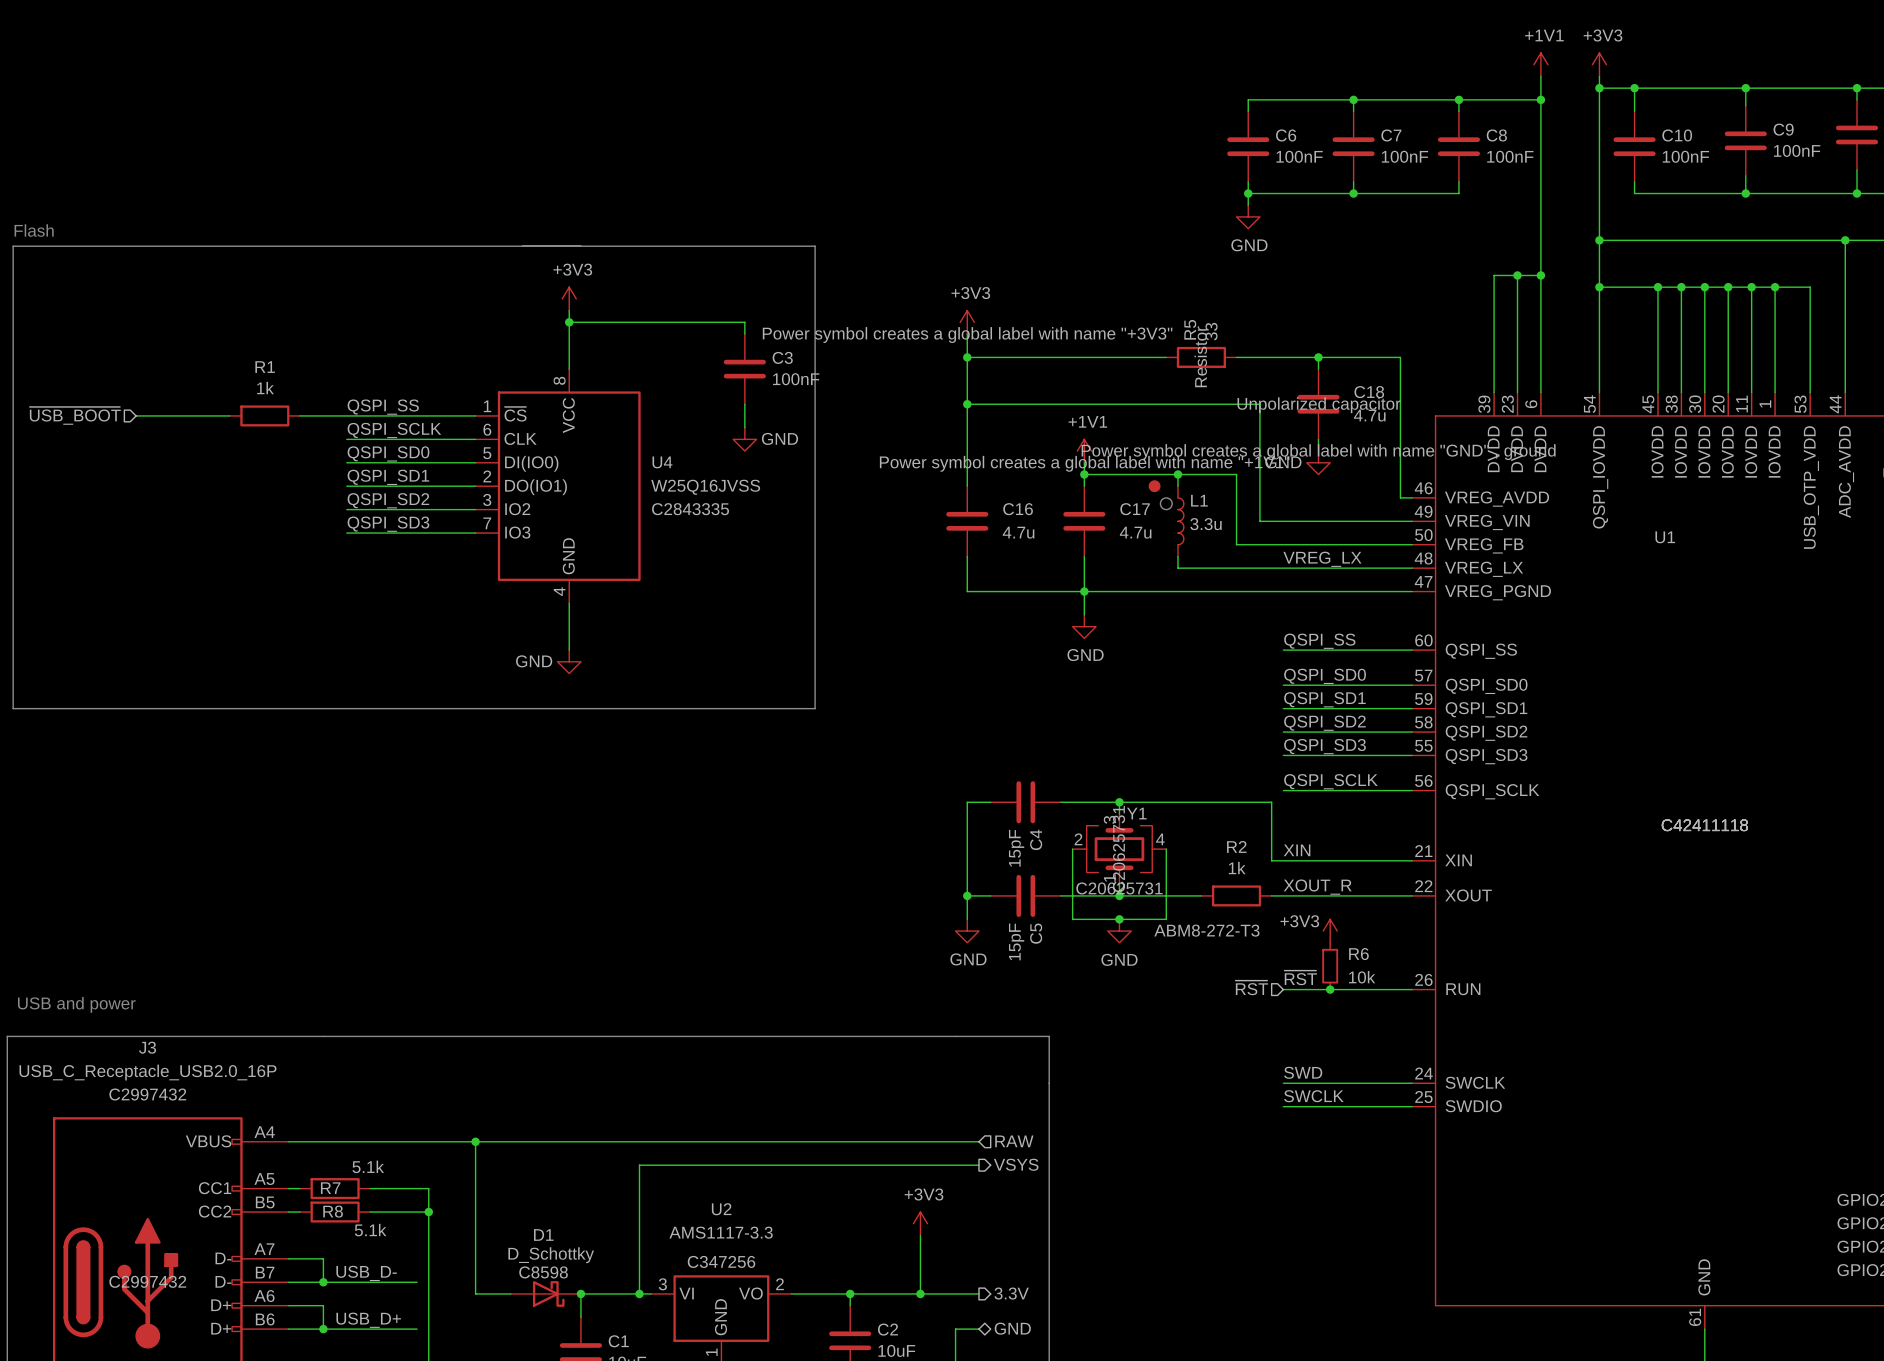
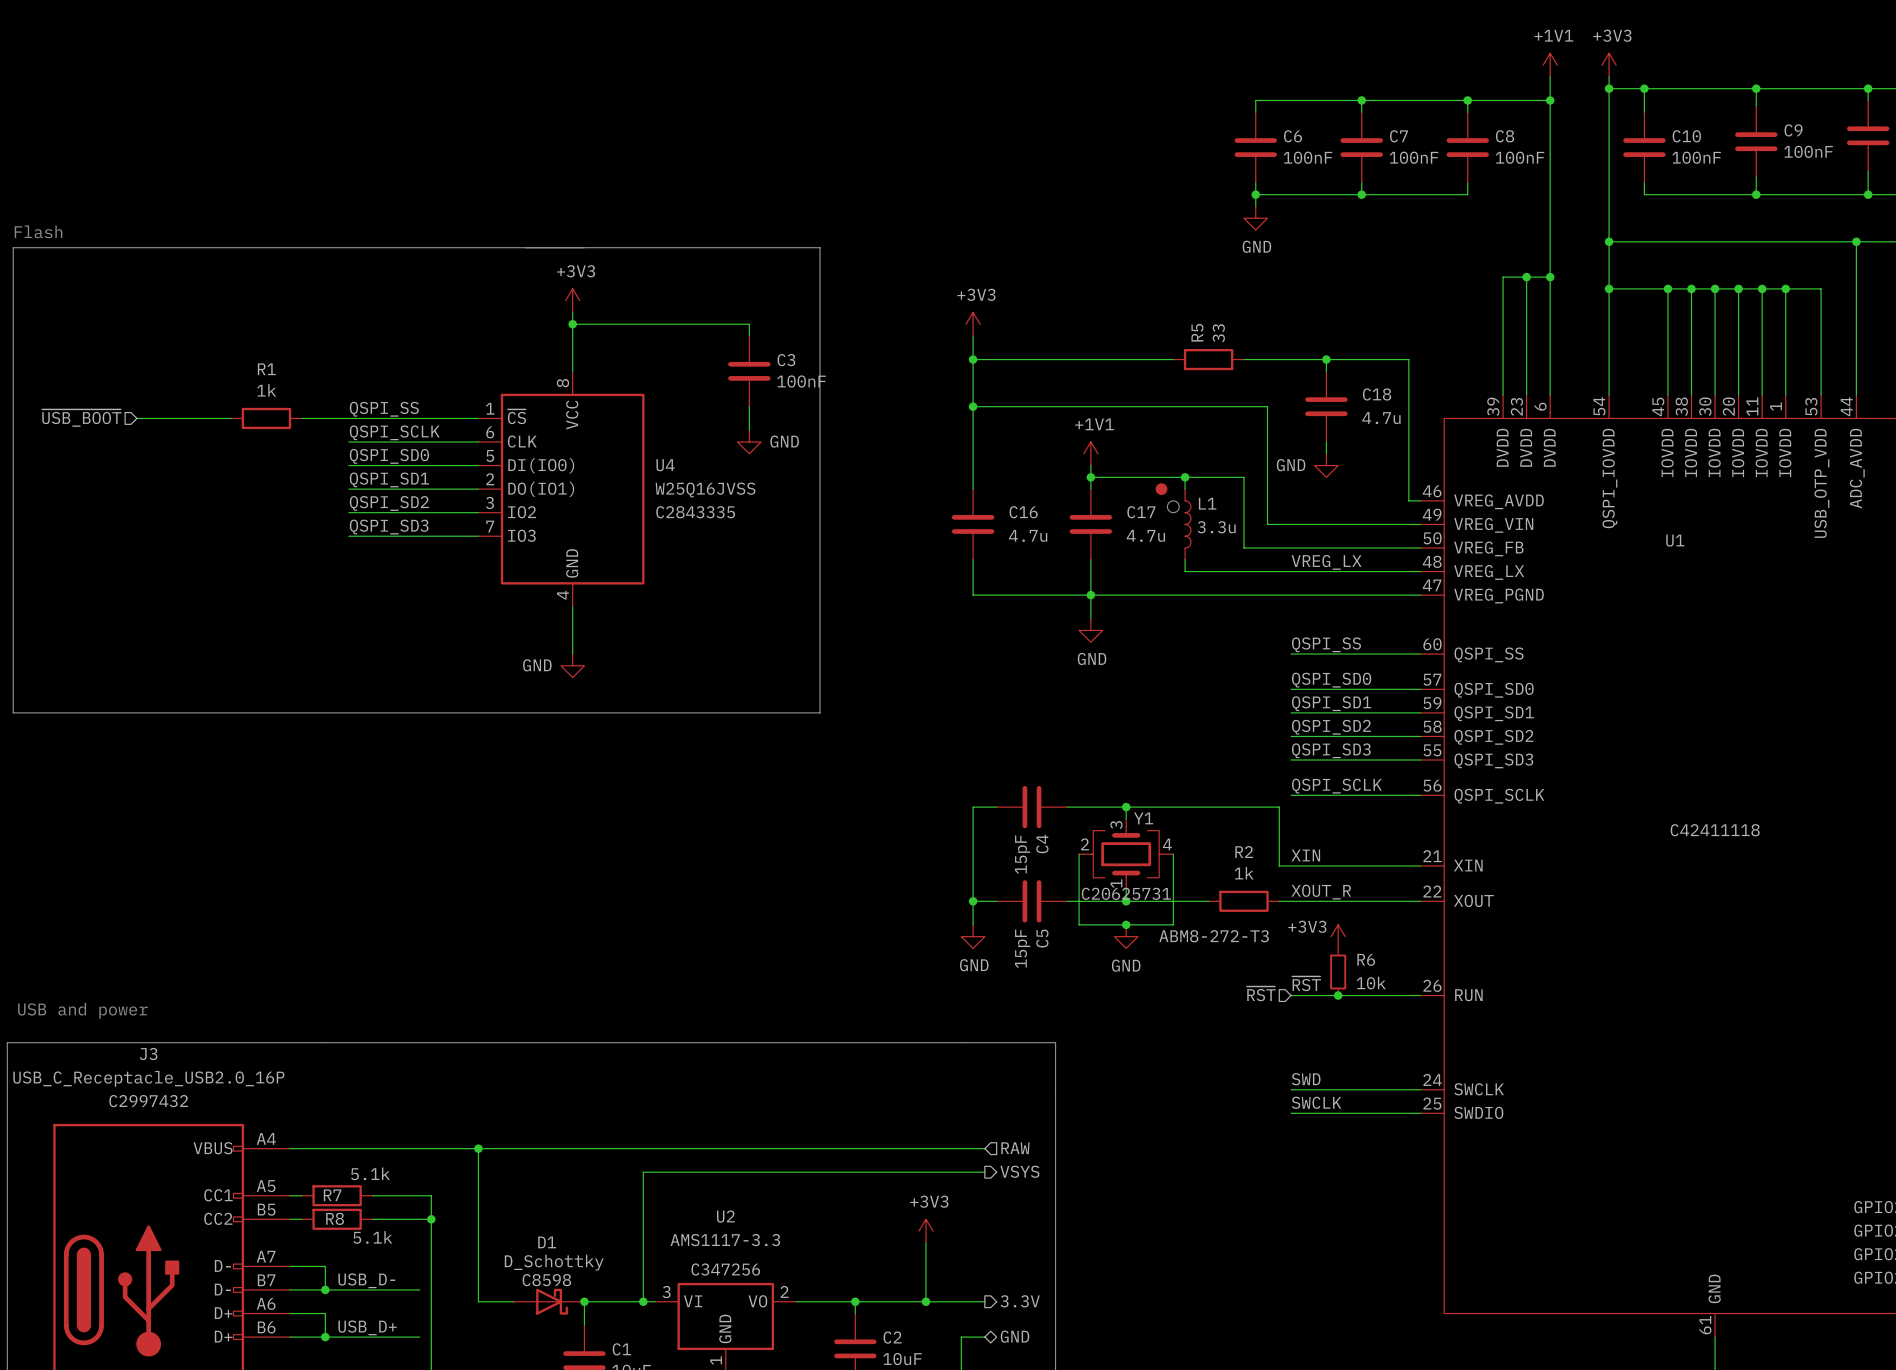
power symbol text: Power symbol creates a global label with name "+3V3" (967, 335) -> none
R5 text: Resistor (1200, 356) -> none
C18 text: Unpolarized capacitor (1319, 405) -> none
power symbol text: Power symbol creates a global label with name "GND" , ground (1318, 452) -> none
power symbol text: Power symbol creates a global label with name "+1V1" (1084, 463) -> none
U1 text: C42411118 (1704, 825) -> none
Y1 text: C20625731 (1119, 849) -> none
J3 text: C2997432 (147, 1281) -> none

